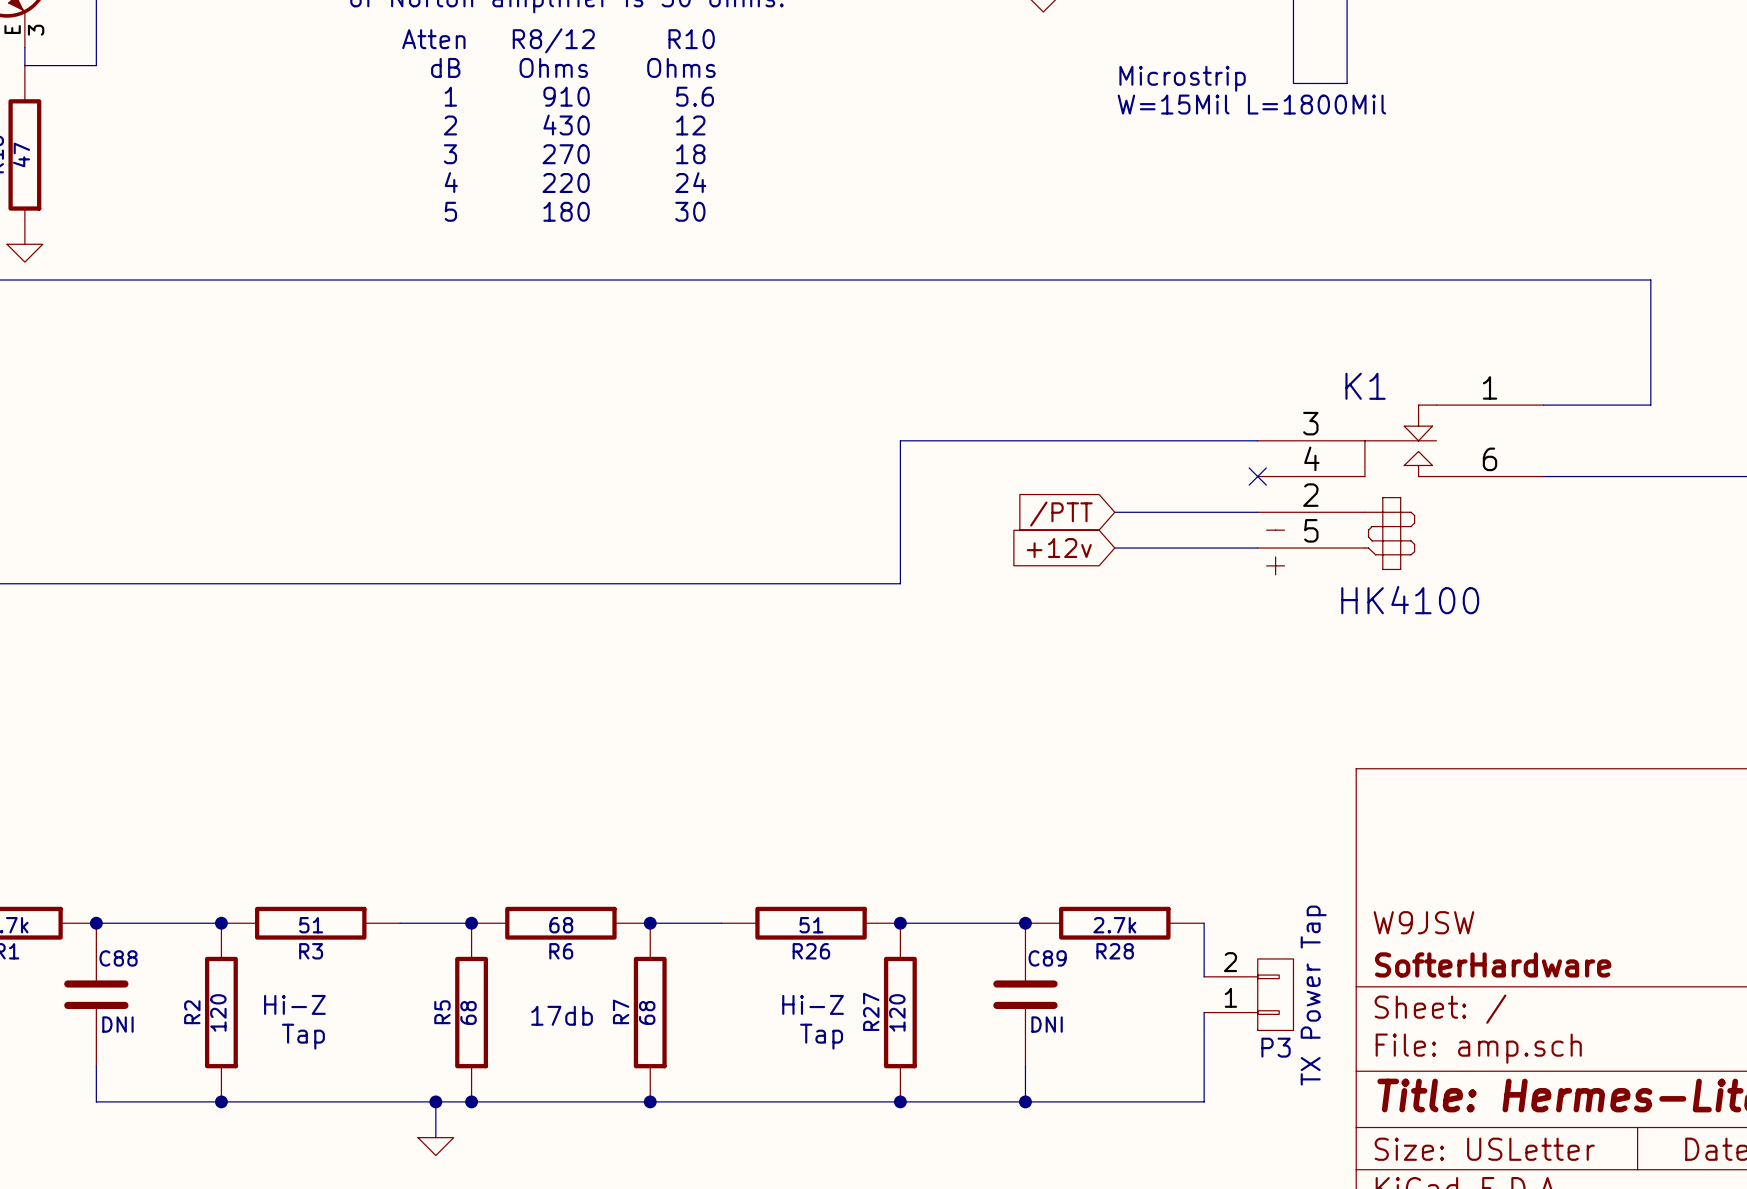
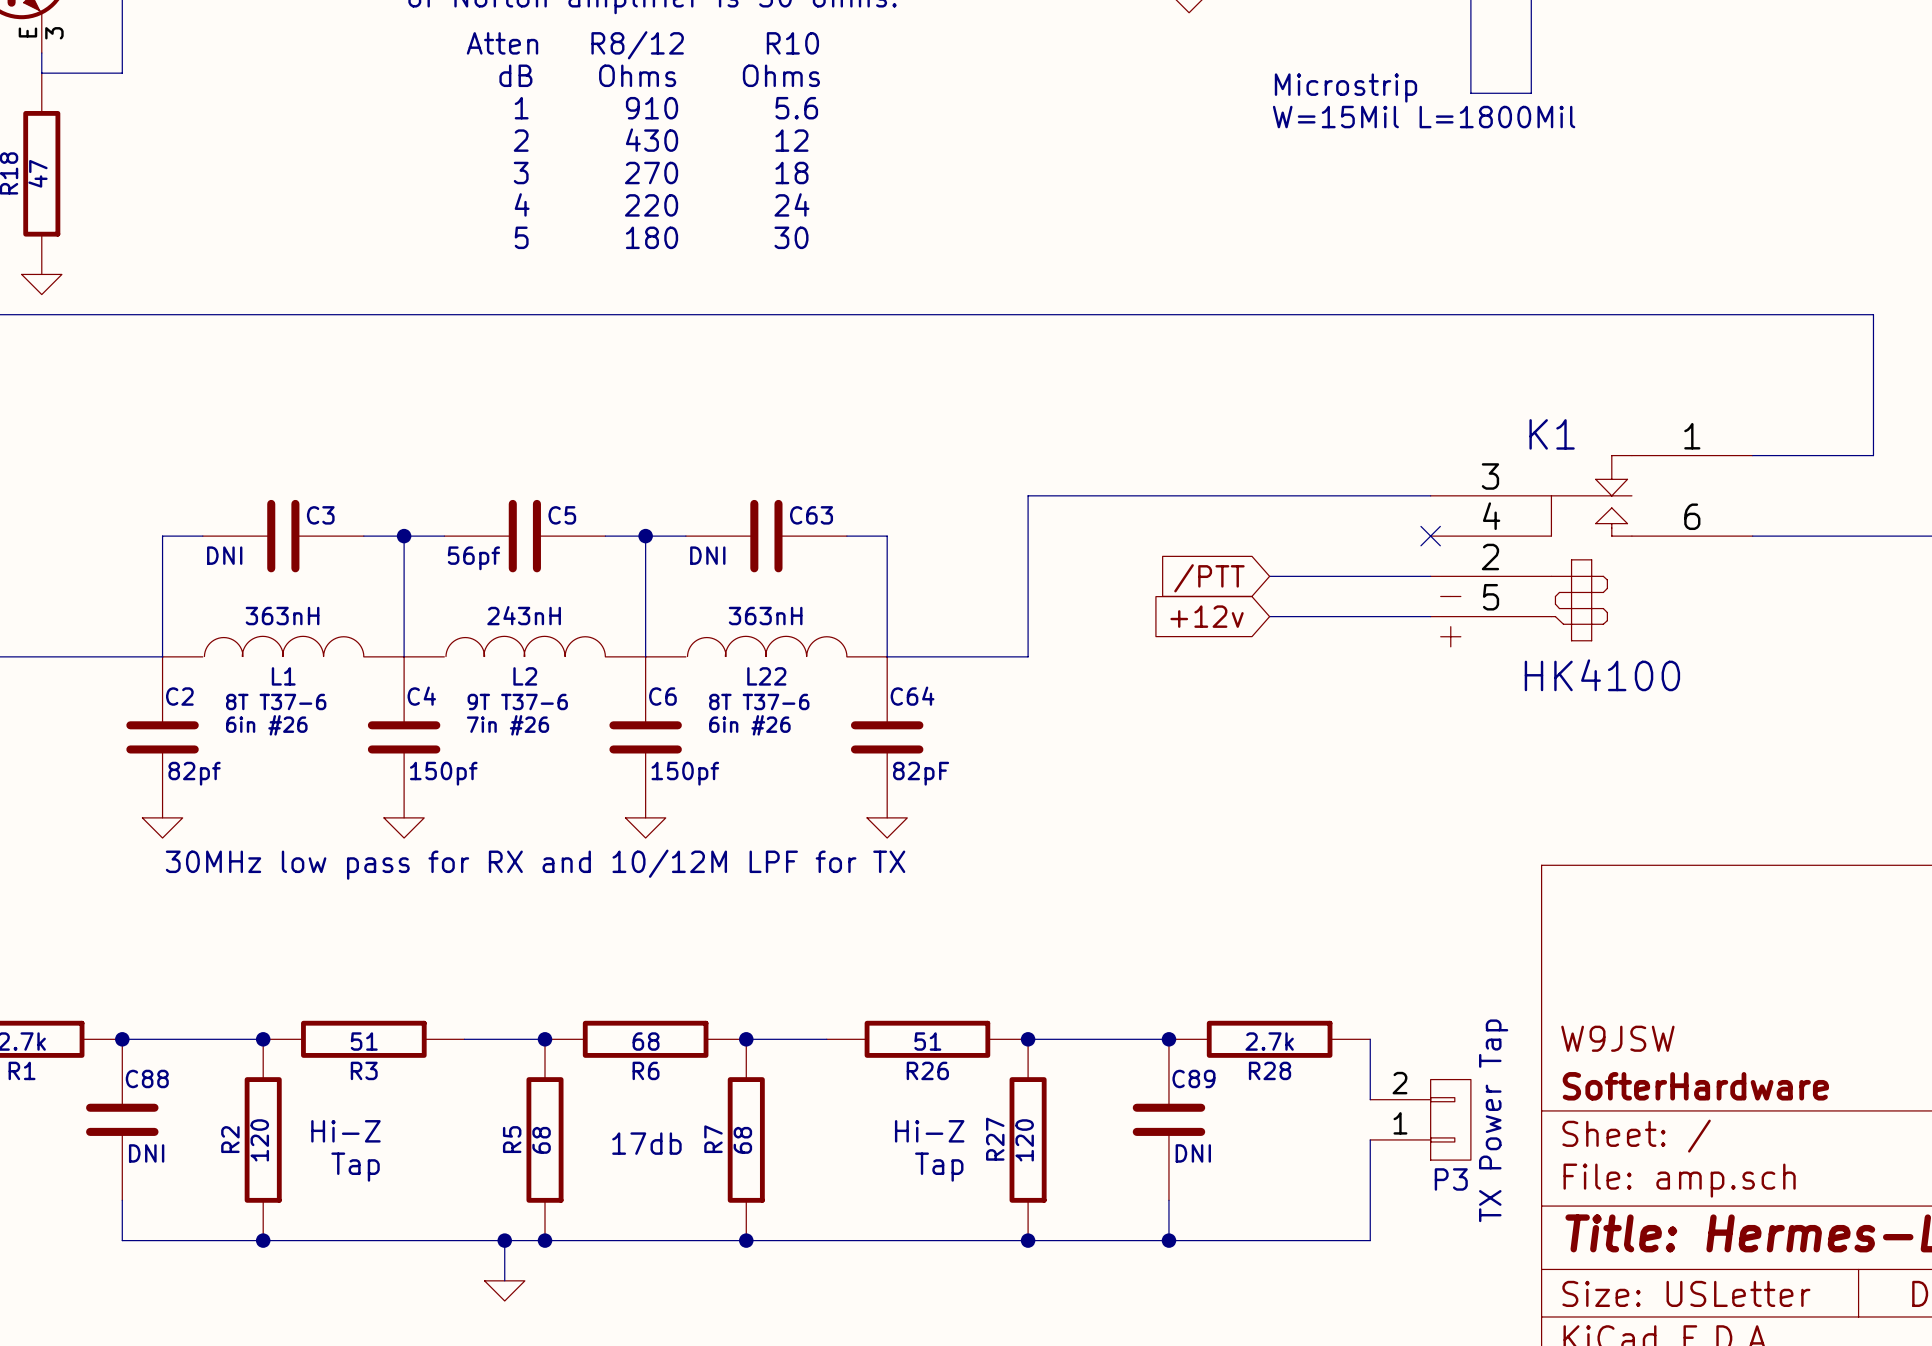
C3: none -> DNI (283, 536)
wire: none -> (363, 536) (444, 536)
wire: none -> (404, 536) (404, 656)
junction: none -> (404, 536)
C5: none -> 56pf (524, 536)
wire: none -> (605, 536) (685, 536)
wire: none -> (645, 536) (645, 656)
junction: none -> (645, 536)
C63: none -> DNI (766, 536)
wire: none -> (846, 536) (887, 536) (887, 656)
L1: none -> 363nH (283, 646)
L2: none -> 243nH (524, 646)
L22: none -> 363nH (766, 646)
wire: (132, 583) (775, 583) -> (162, 656) (162, 536) (202, 536)
text: none -> 8T T37-6 (276, 701)
text: none -> 9T T37-6 (517, 701)
text: none -> 8T T37-6 (759, 701)
text: none -> 6in #26 (266, 725)
text: none -> 7in #26 (508, 725)
text: none -> 6in #26 (749, 725)
C2: none -> 82pf (162, 737)
C4: none -> 150pf (404, 737)
C6: none -> 150pf (645, 737)
C64: none -> 82pF (887, 737)
power symbol: none -> (162, 827)
power symbol: none -> (404, 827)
power symbol: none -> (645, 827)
power symbol: none -> (887, 827)
text: none -> 30MHz low pass for RX and 10/12M LPF for TX (535, 864)

